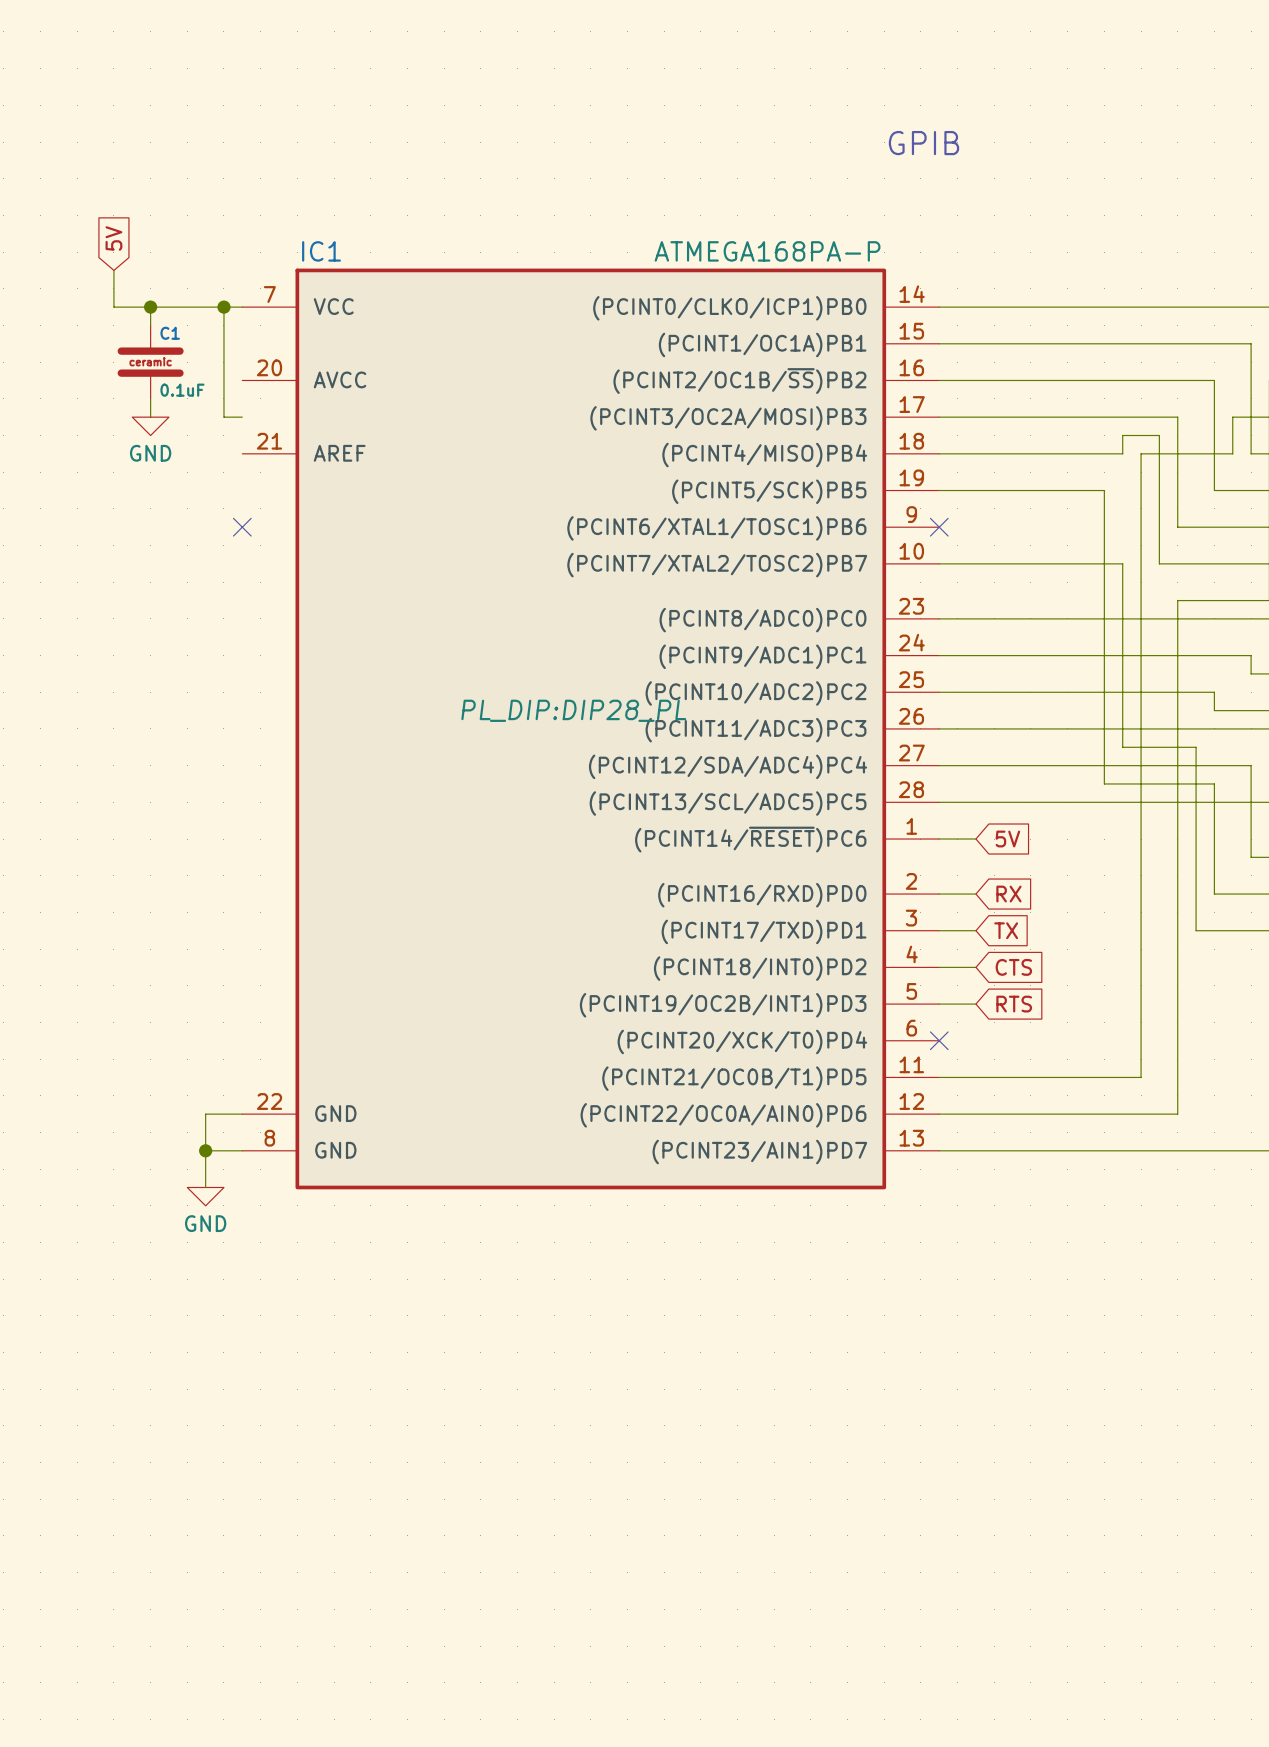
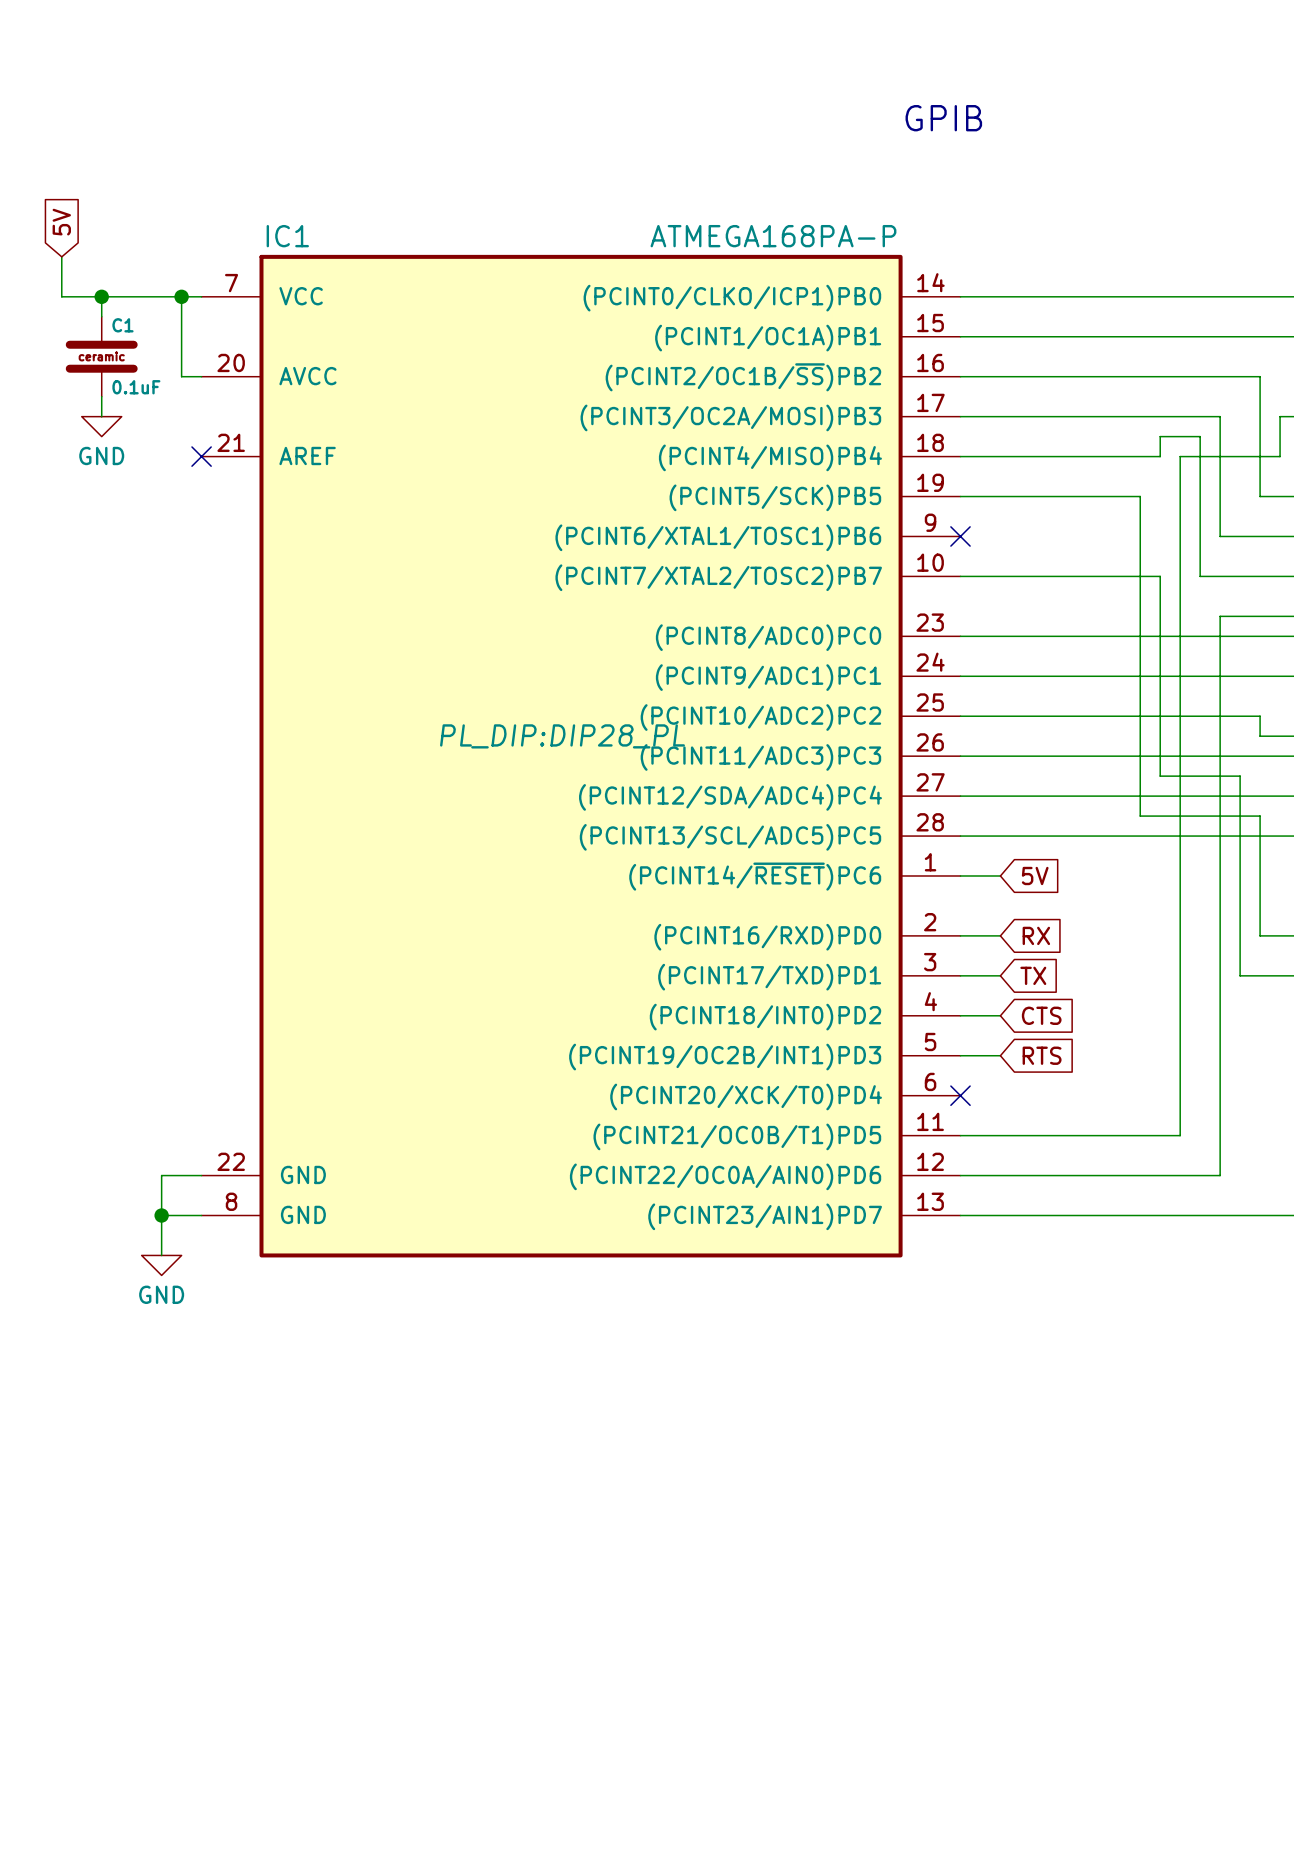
wire: (223, 380) (223, 417) (242, 417) -> (181, 376) (201, 376)
no-connect mark position: (242, 527) -> (201, 456)

